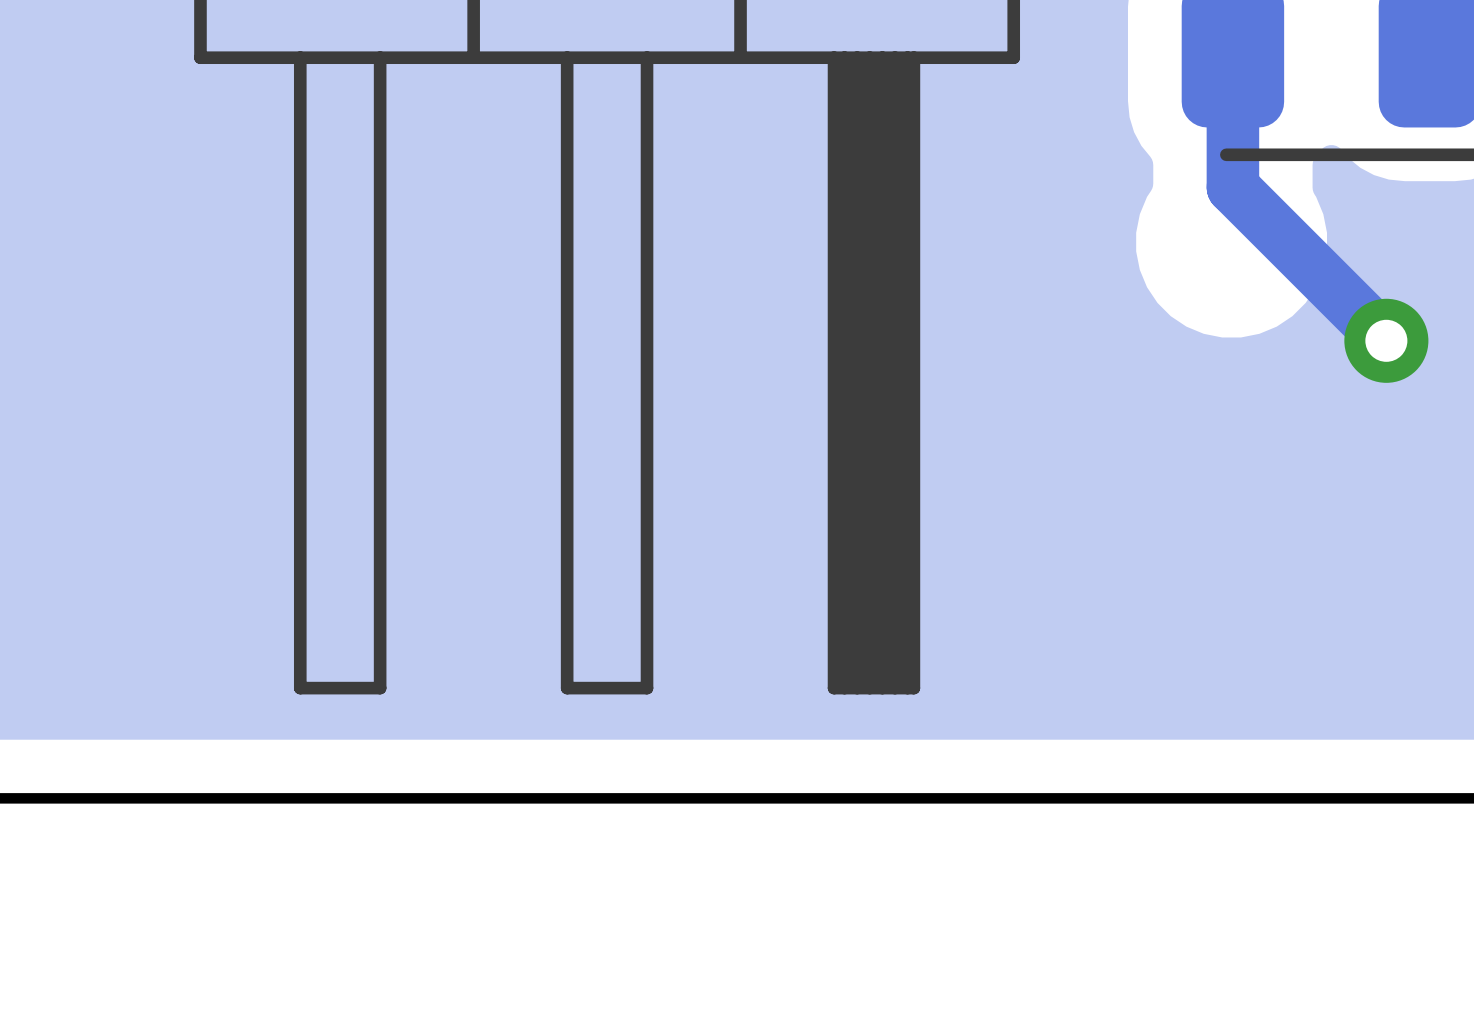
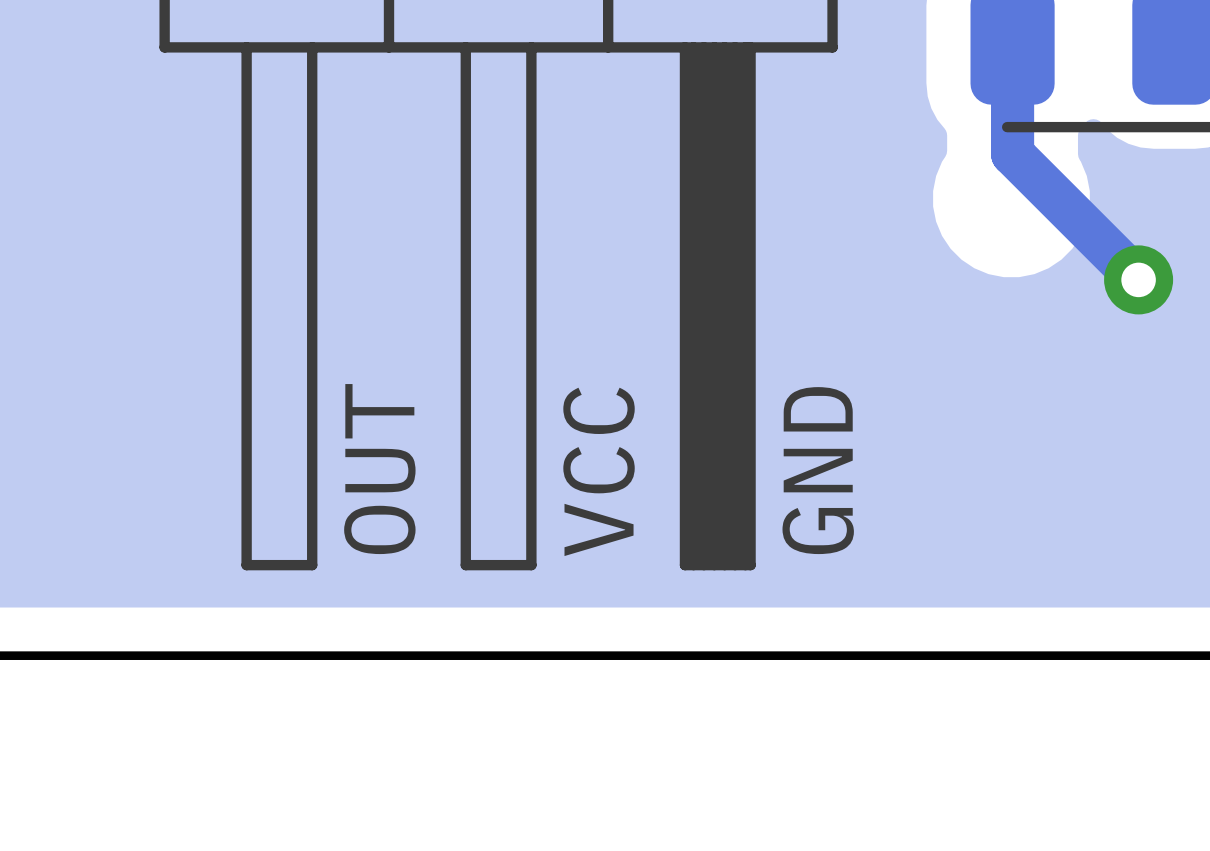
text: none -> OUT (379, 469)
text: none -> GND (818, 470)
text: none -> VCC (599, 471)

